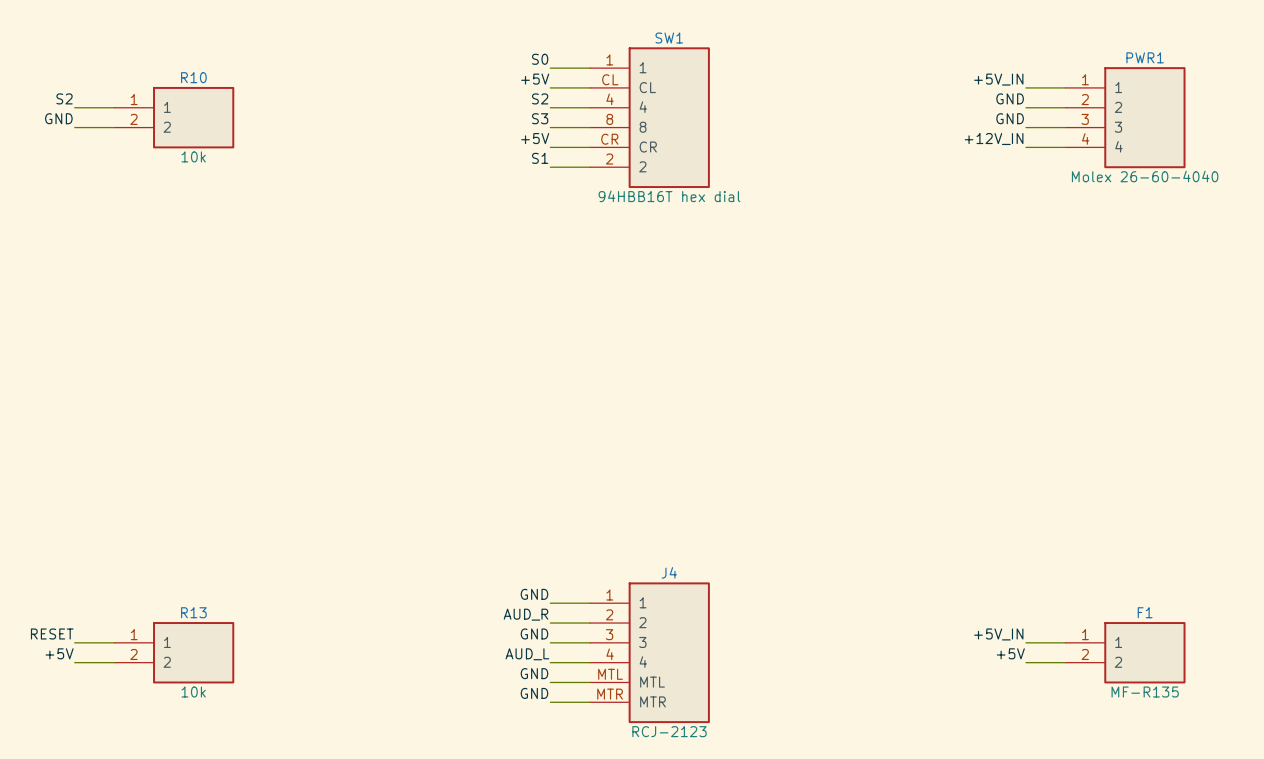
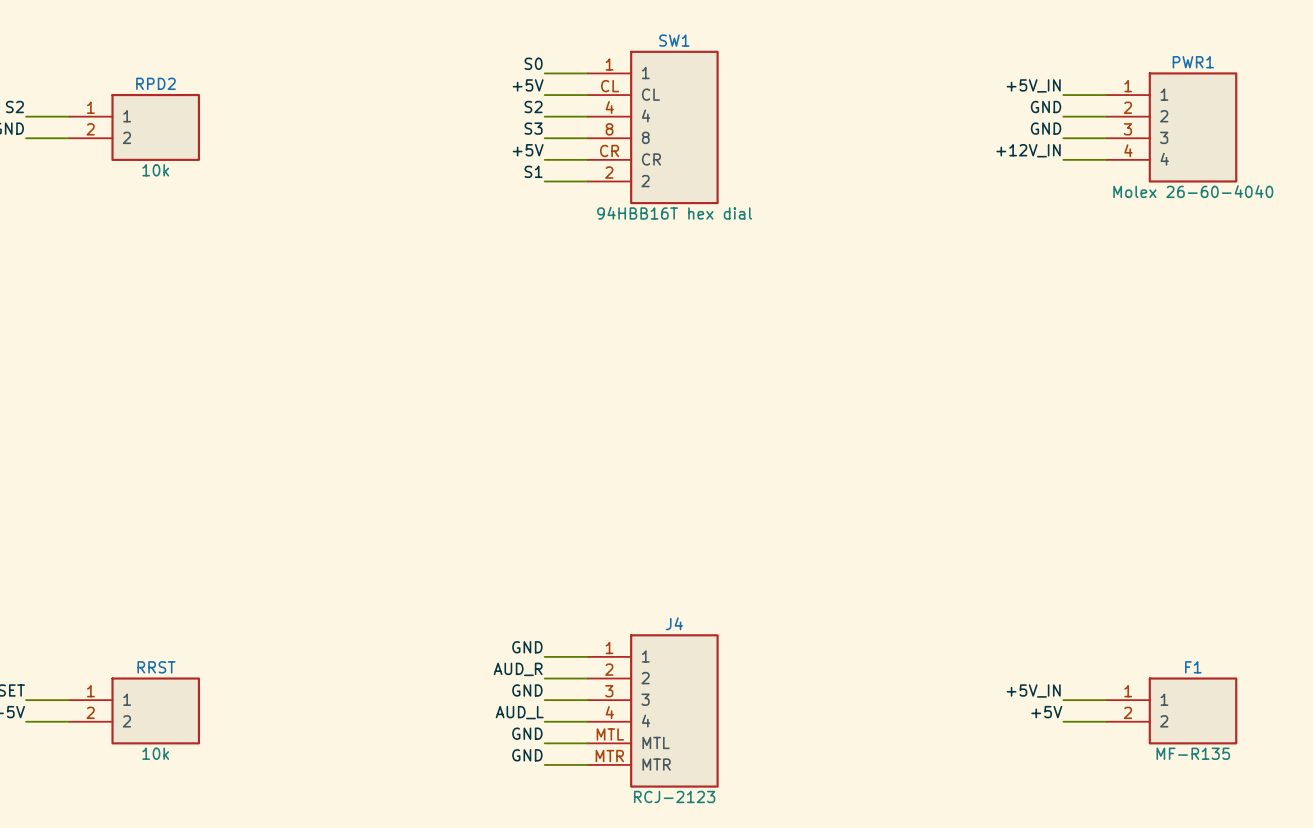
R10 name: R10 (193, 77) -> RPD2 (155, 83)
R13 name: R13 (193, 612) -> RRST (156, 667)

